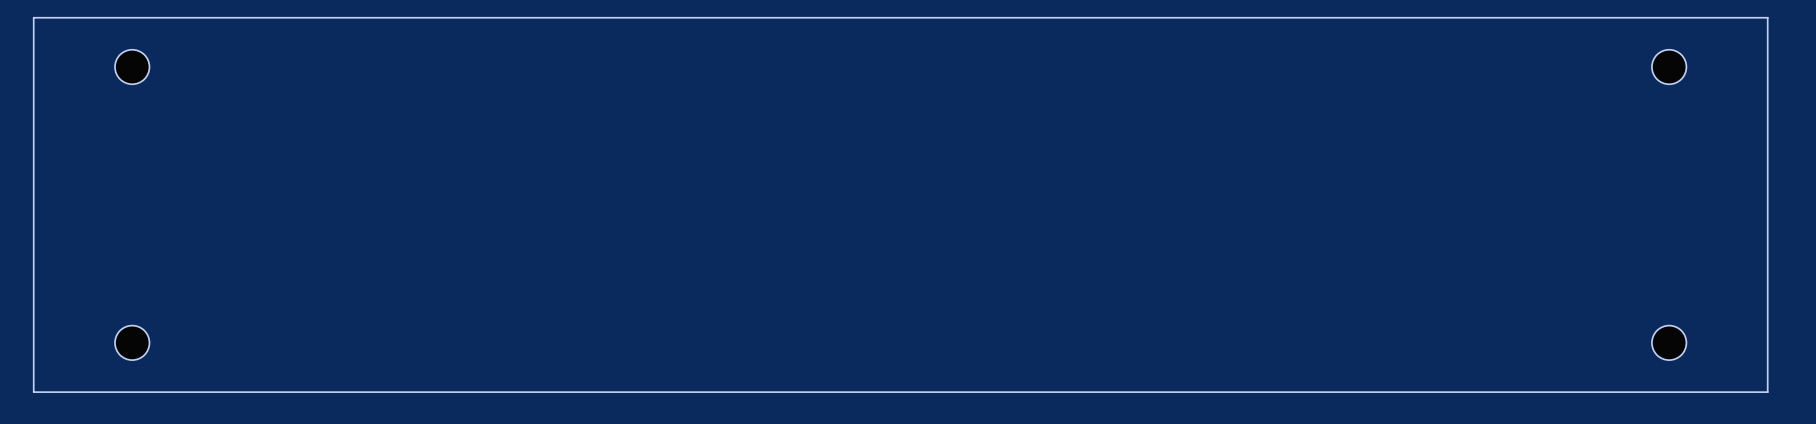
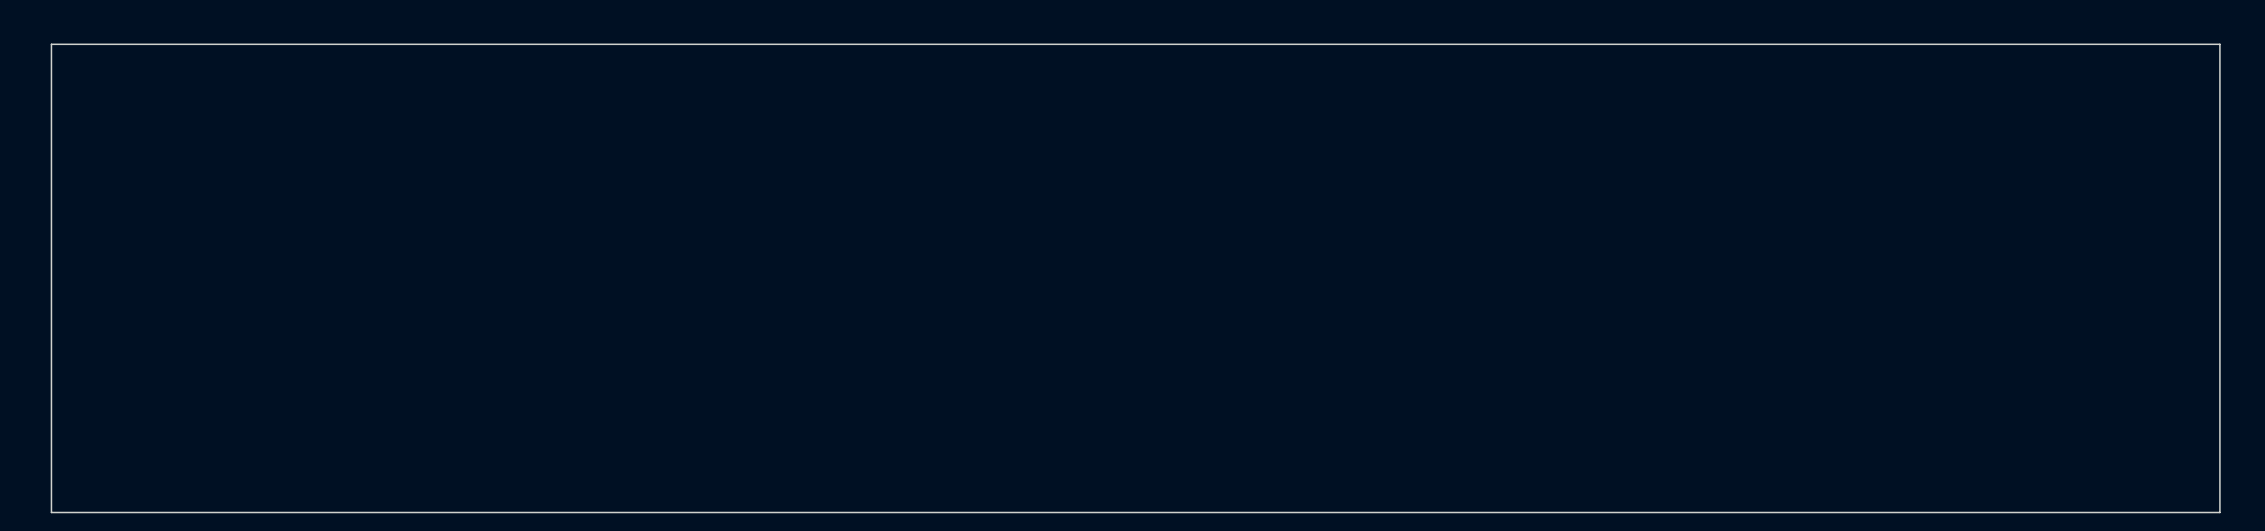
part: (132, 67) -> none
part: (1669, 67) -> none
part: (132, 342) -> none
part: (1669, 342) -> none

